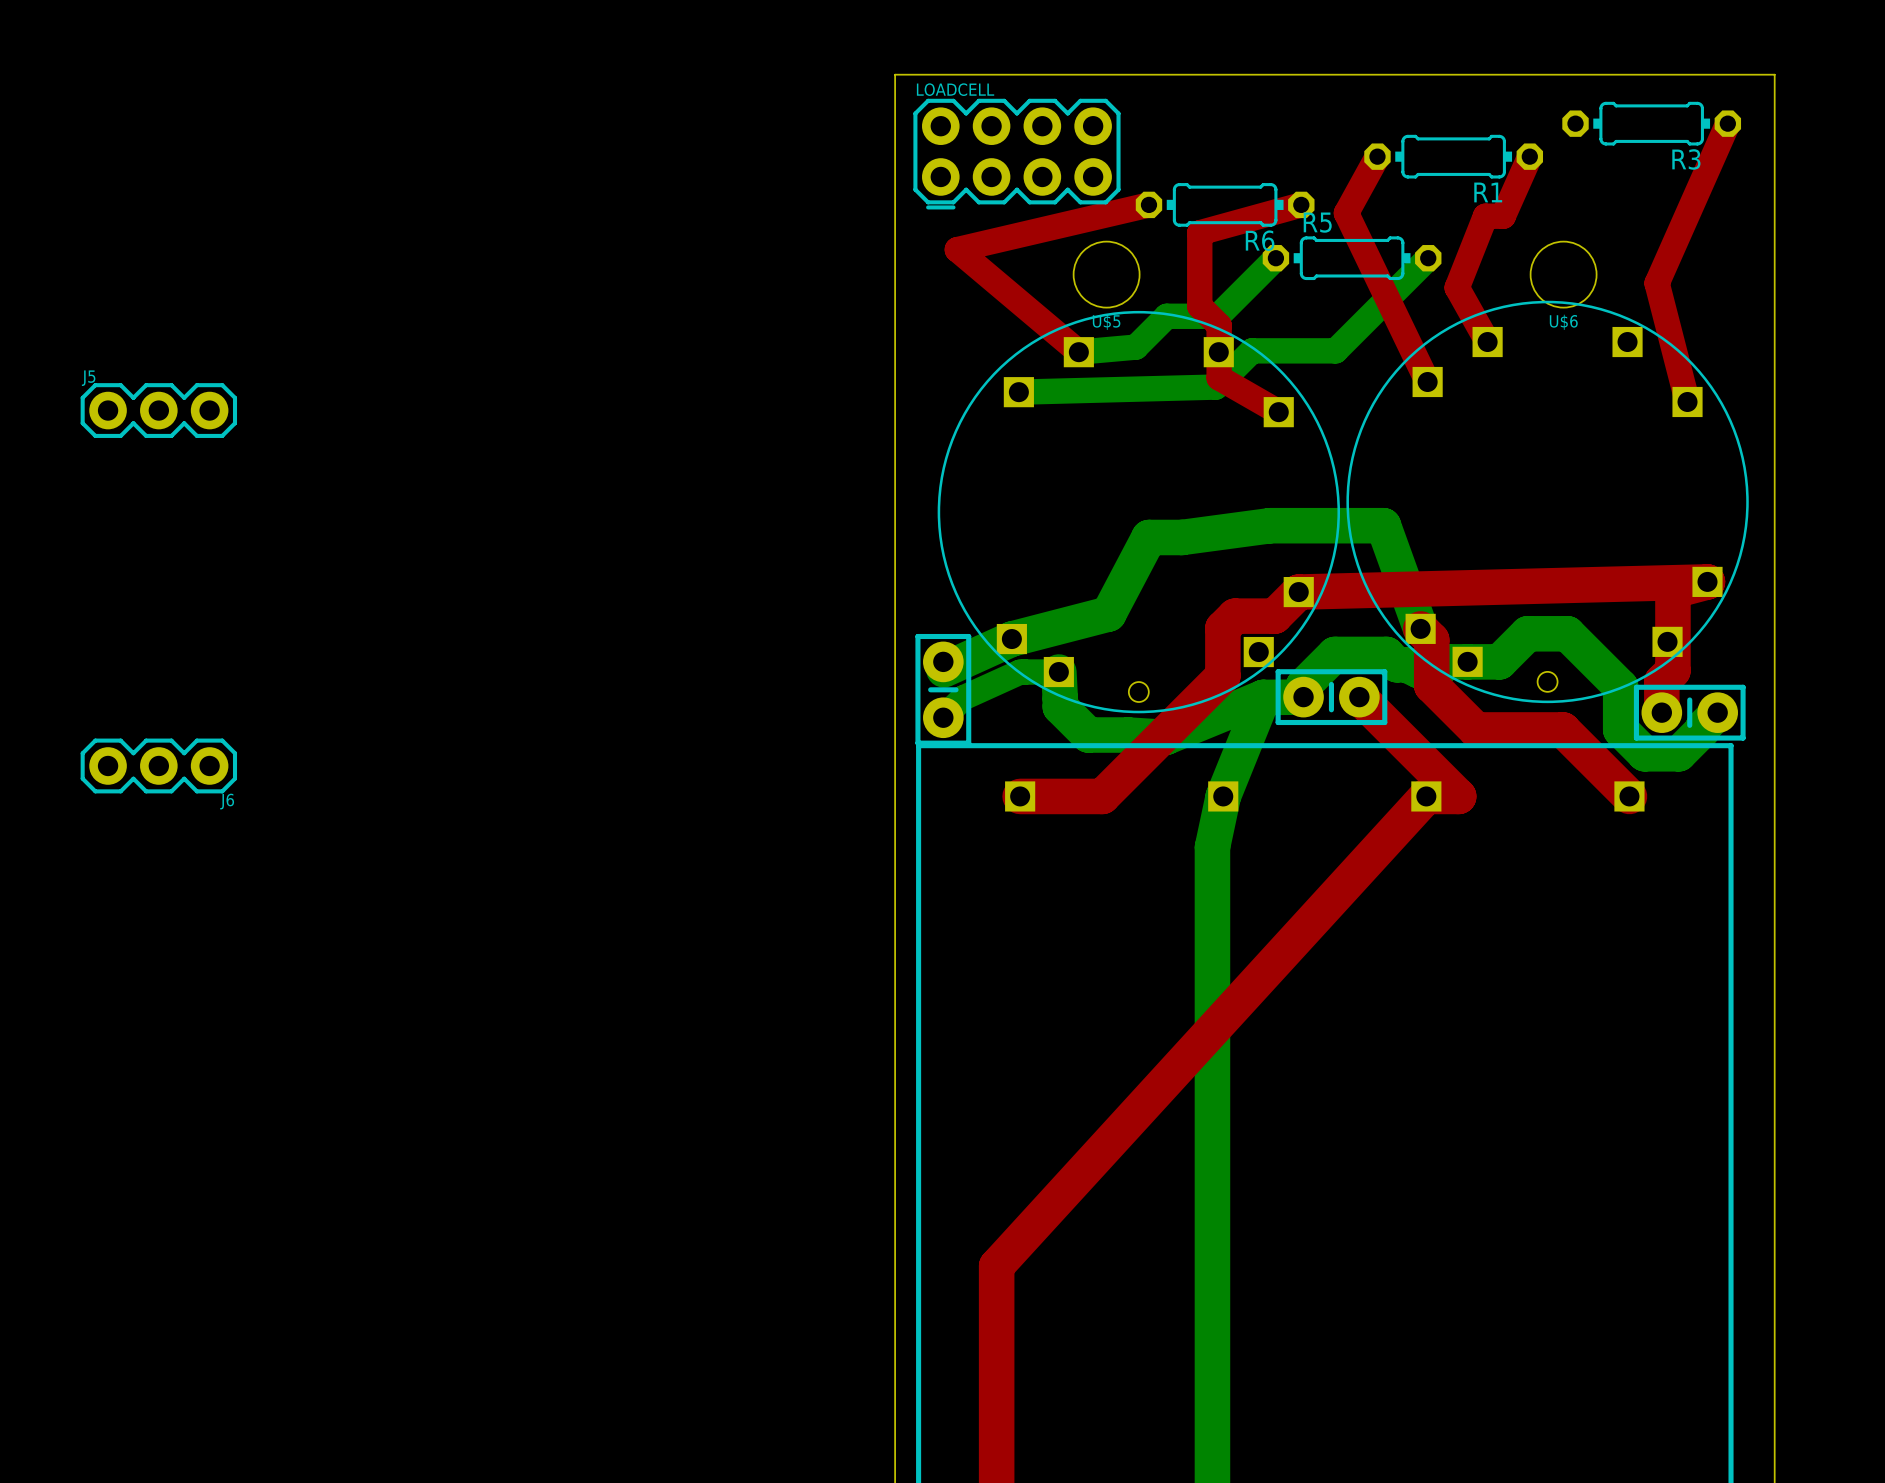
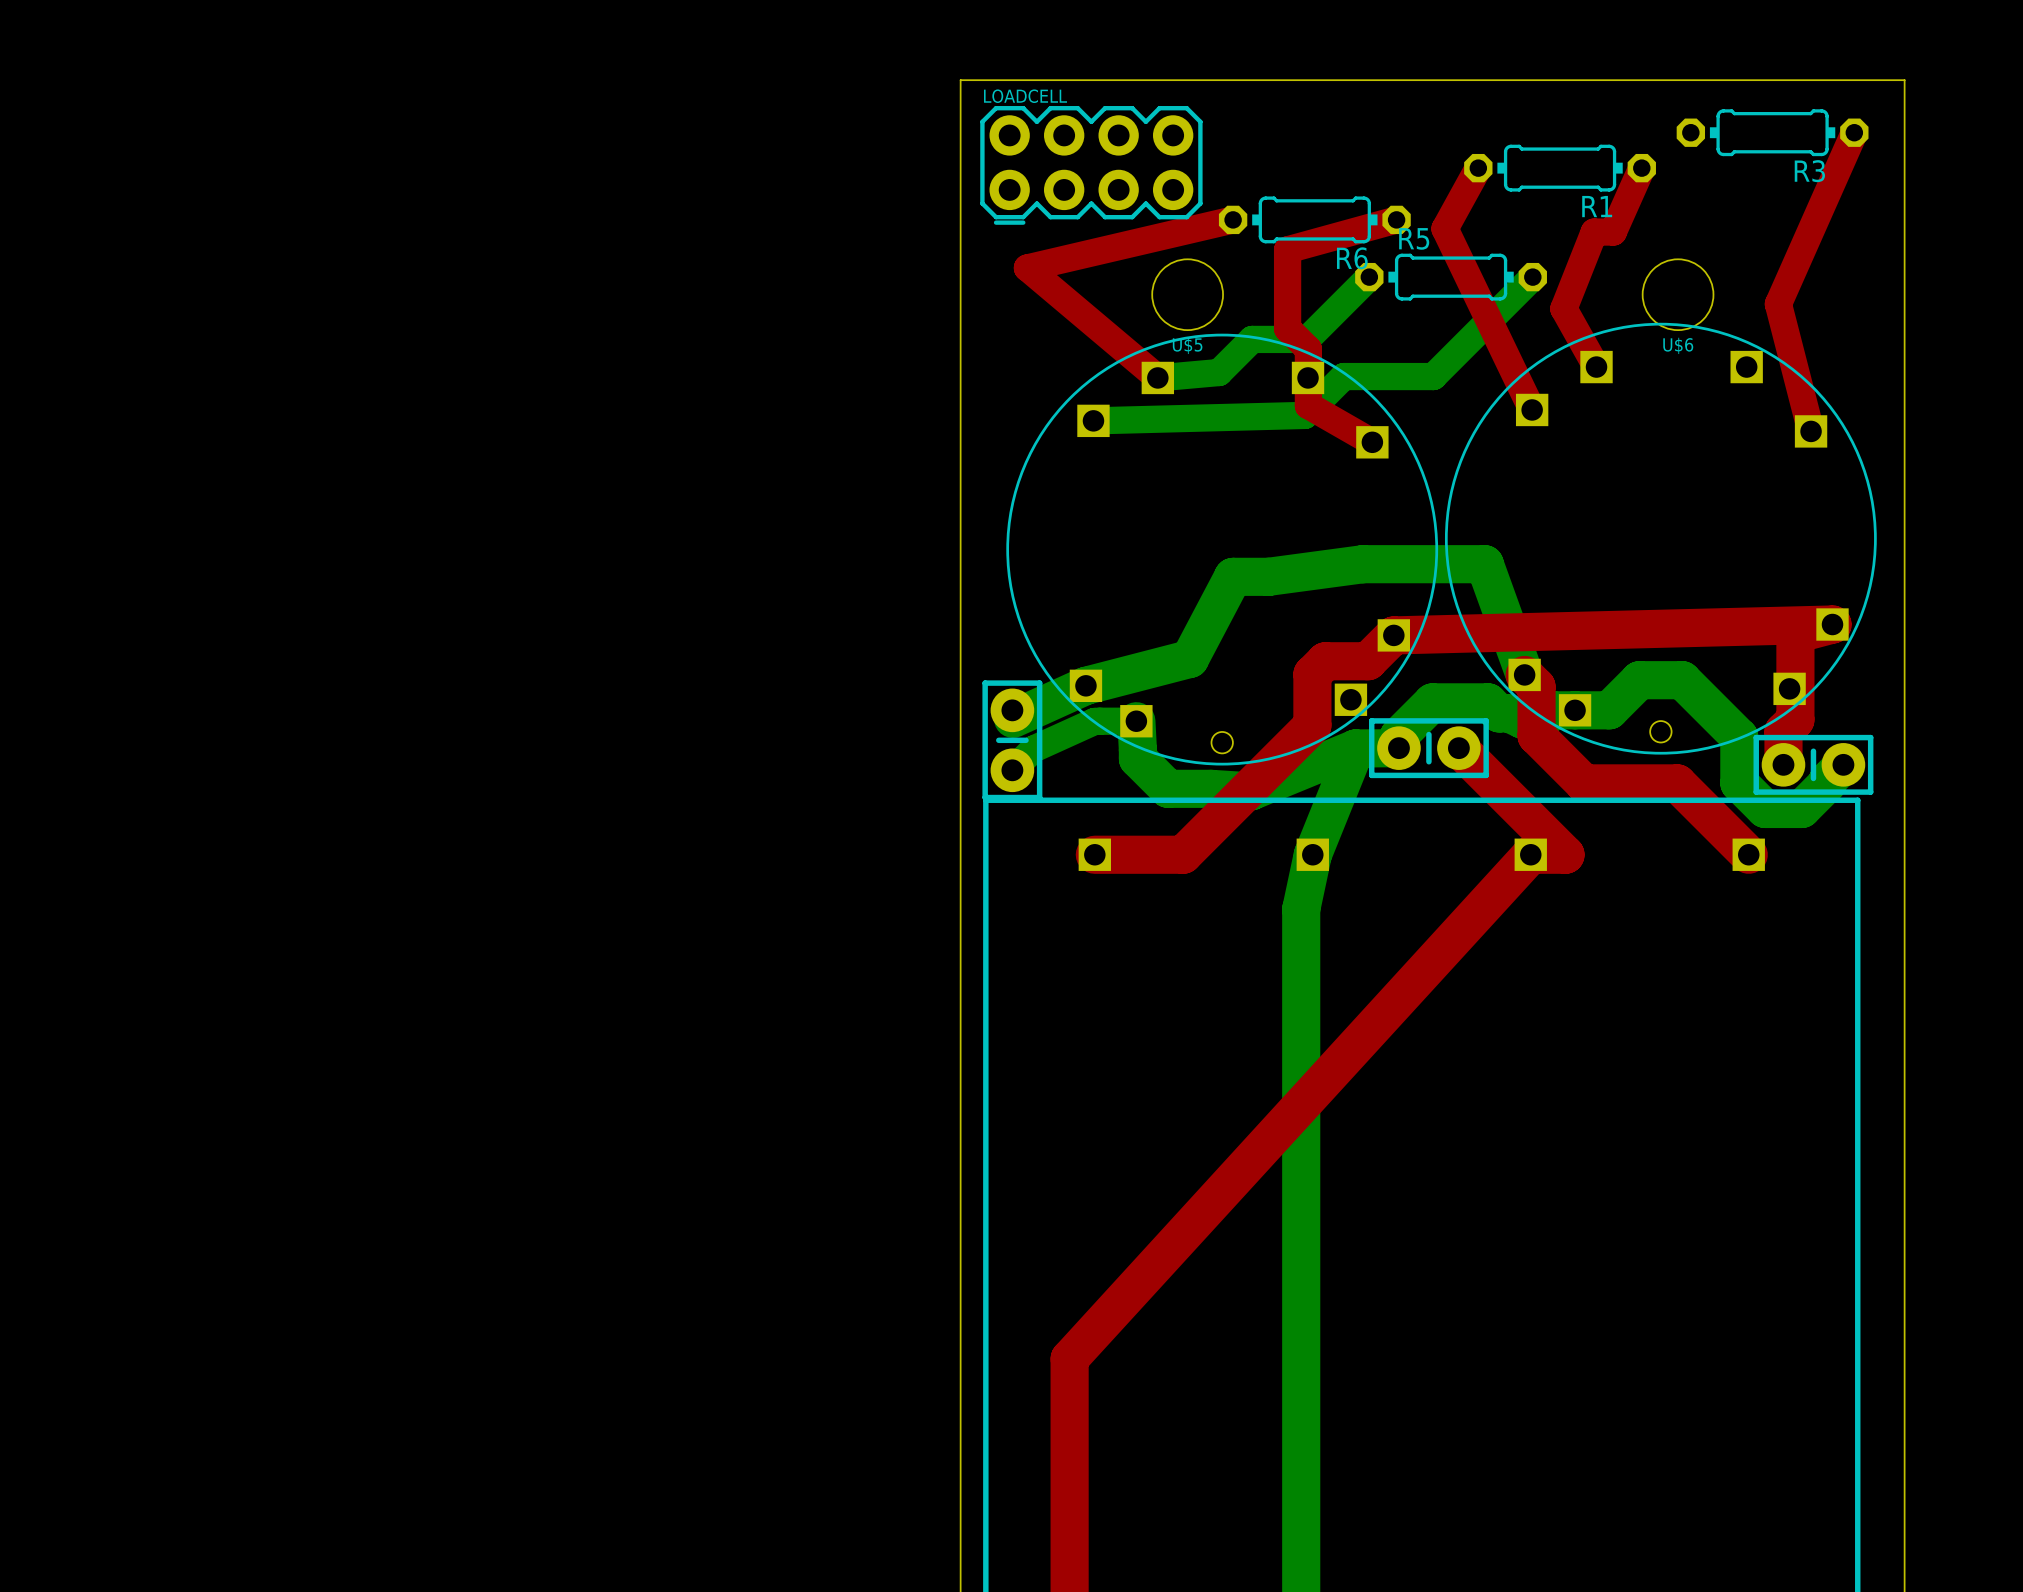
J5: (158, 410) -> none
J6: (158, 765) -> none

